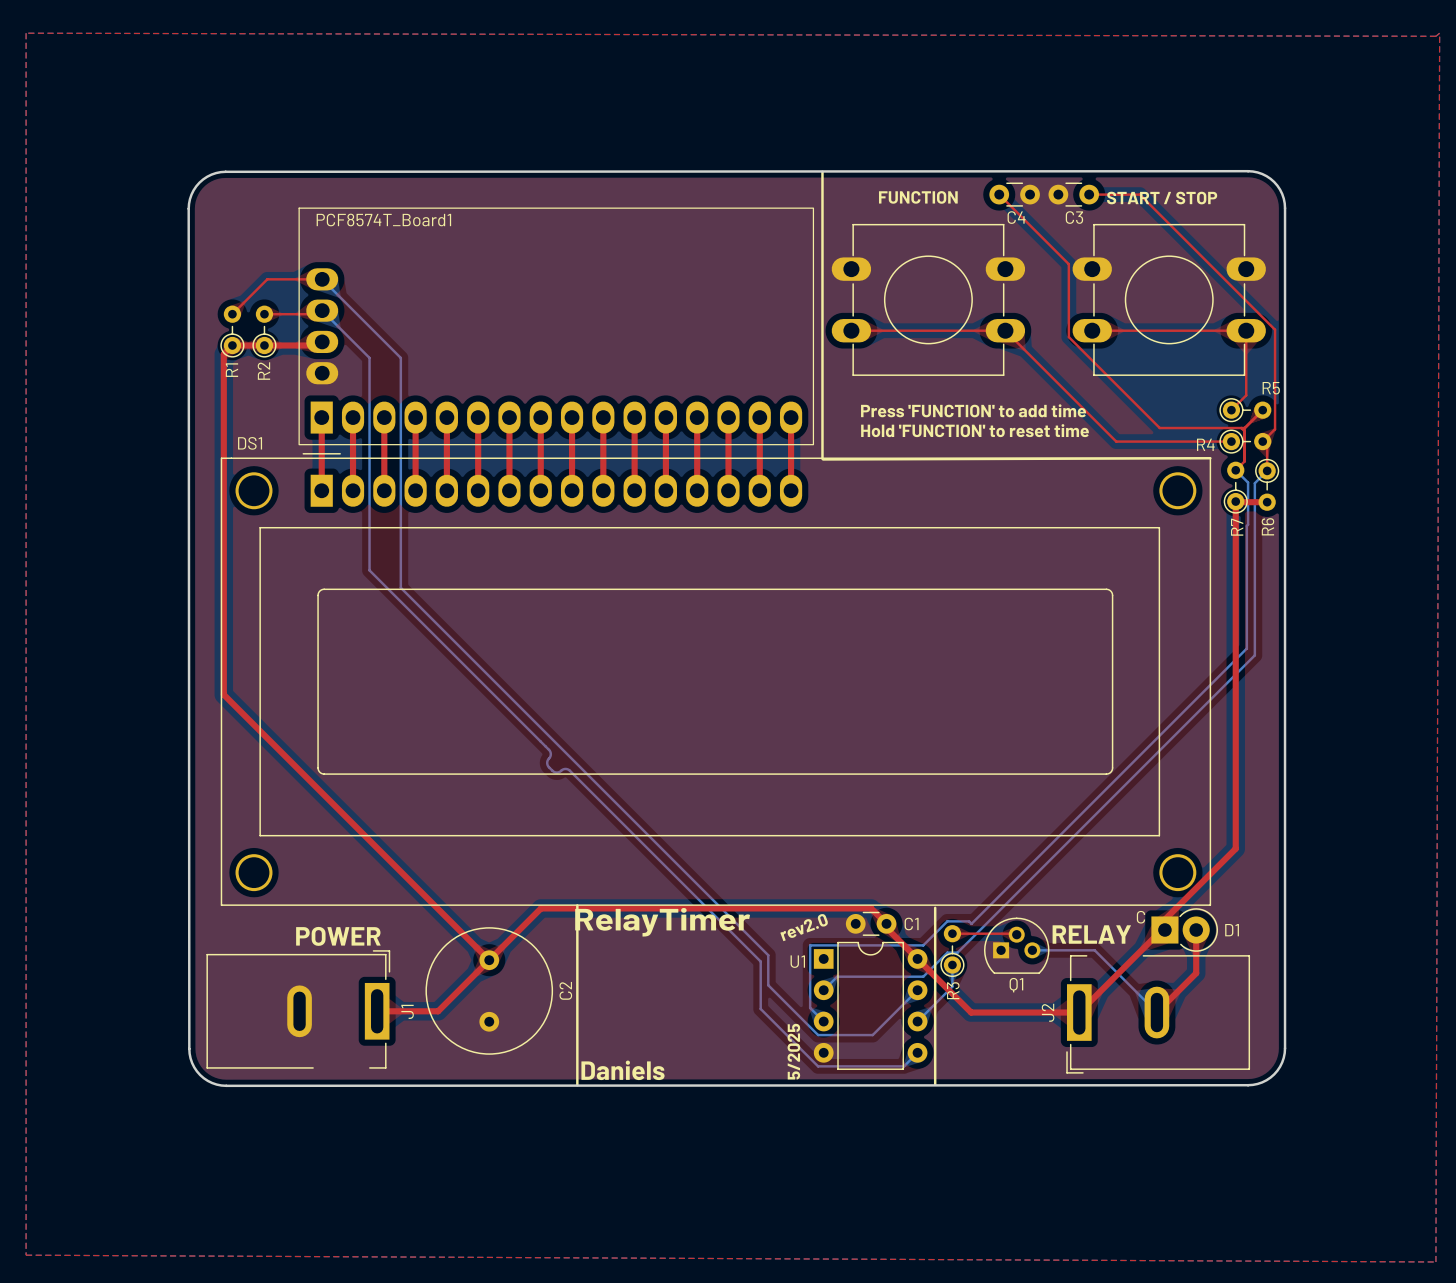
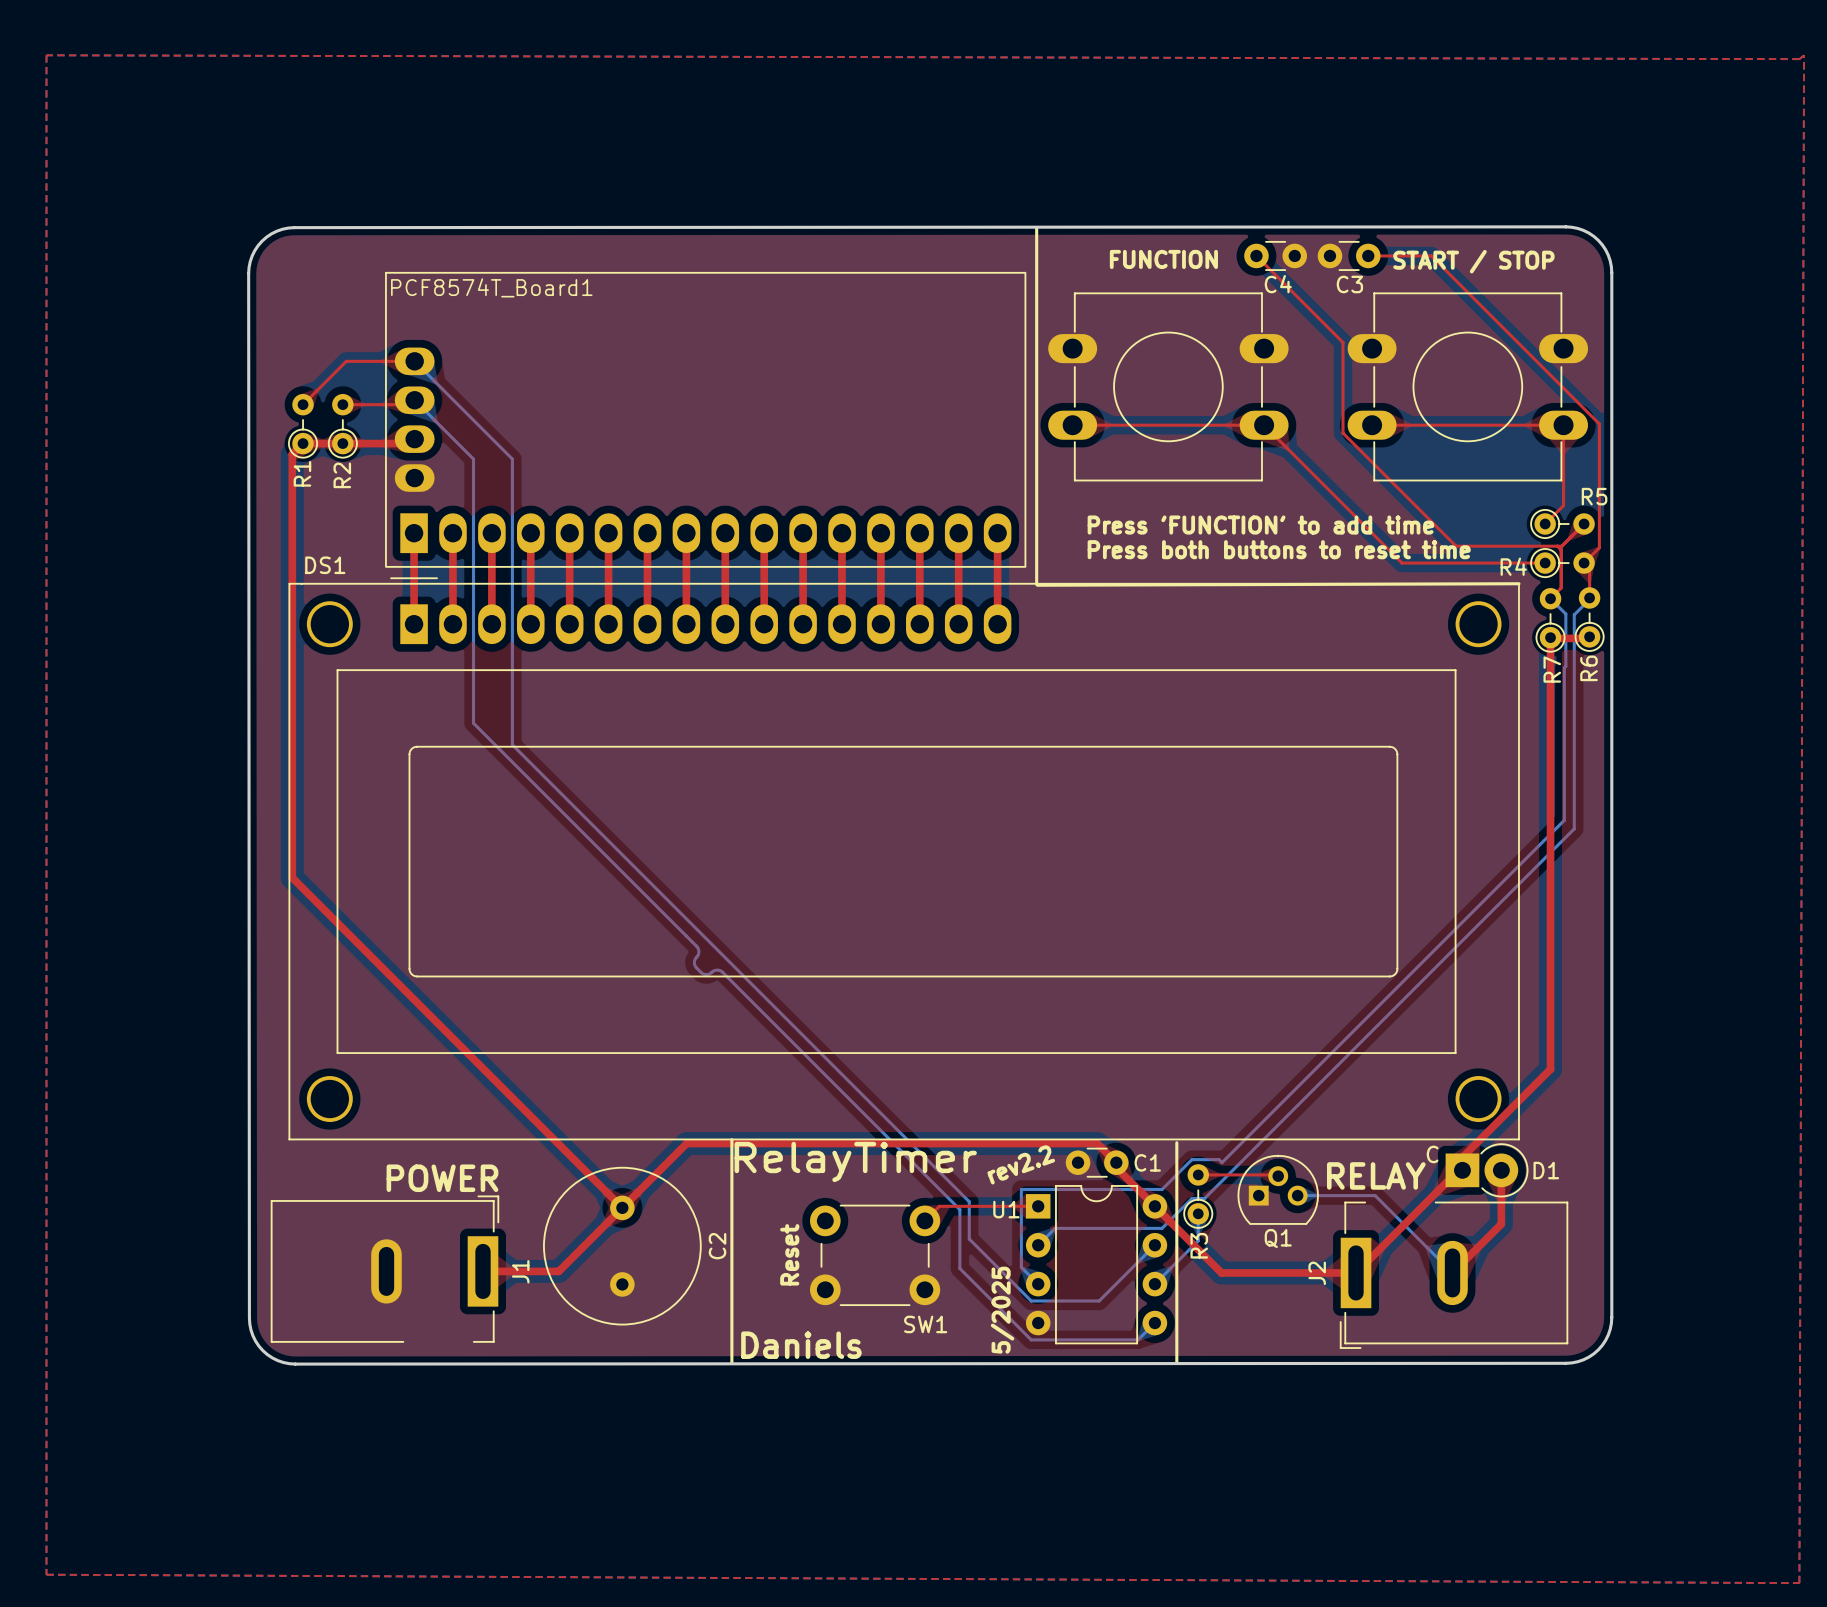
text: Hold 'FUNCTION' to reset time (975, 430) -> Press both buttons to reset time (1279, 549)
R6 rotation: 0° (1267, 484) -> 180° (1589, 619)
text: rev2.0 (804, 927) -> rev2.2 (1021, 1164)
top track: none -> (1038, 1206) (939, 1206) (924, 1220)
SW1: none -> (875, 1255)
text: none -> Reset (789, 1254)

